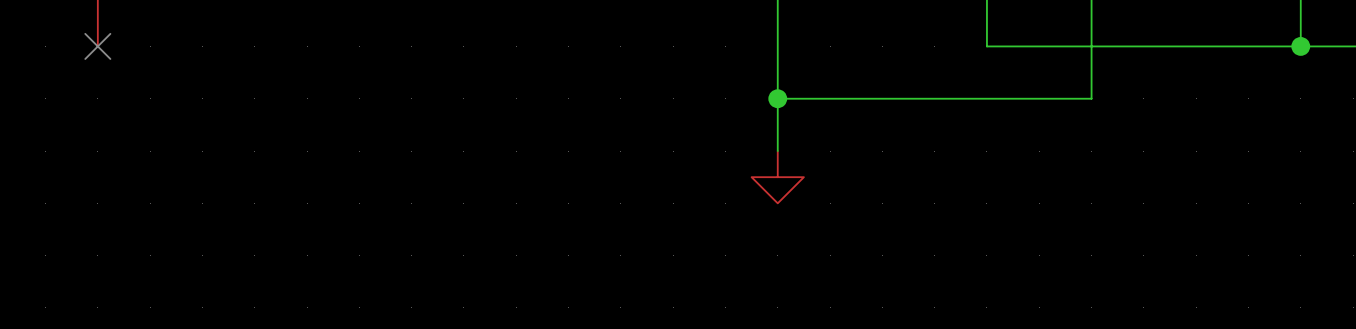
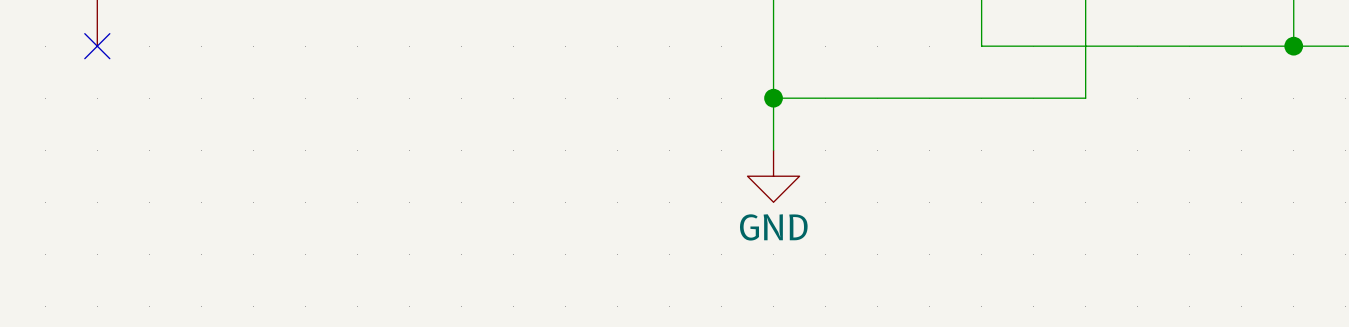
power symbol text: none -> GND (773, 227)

